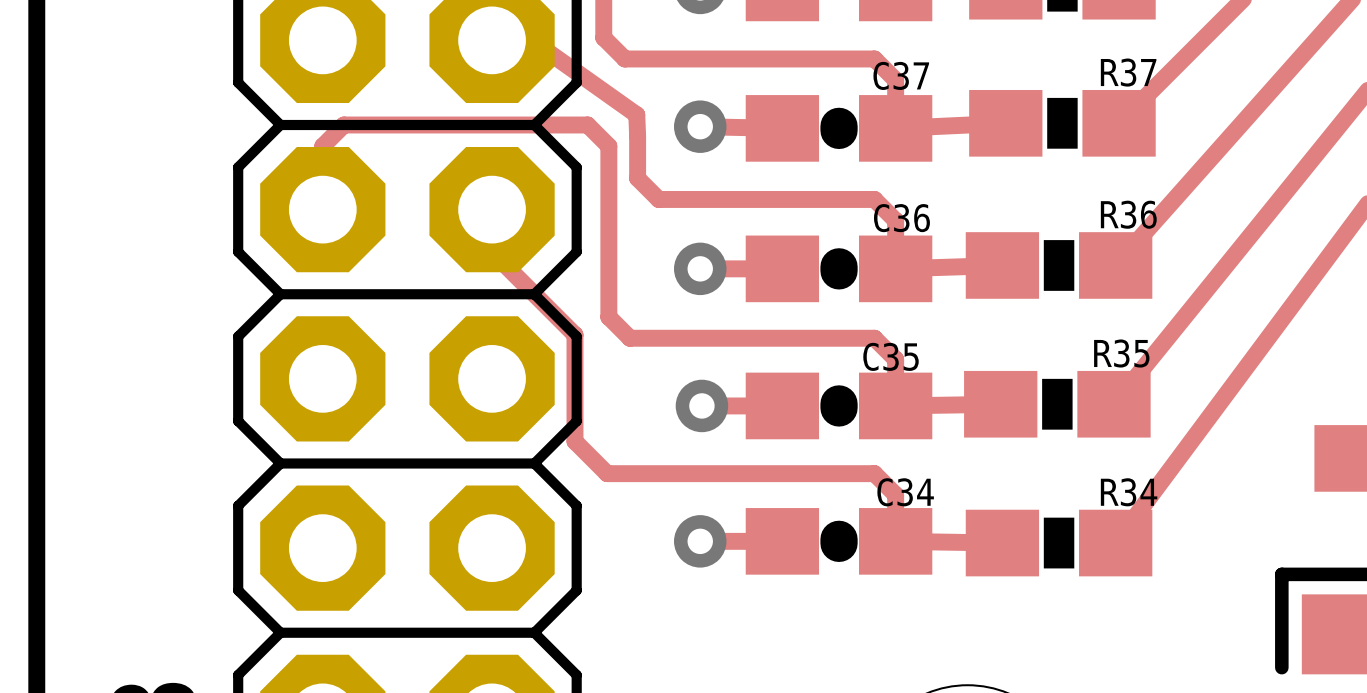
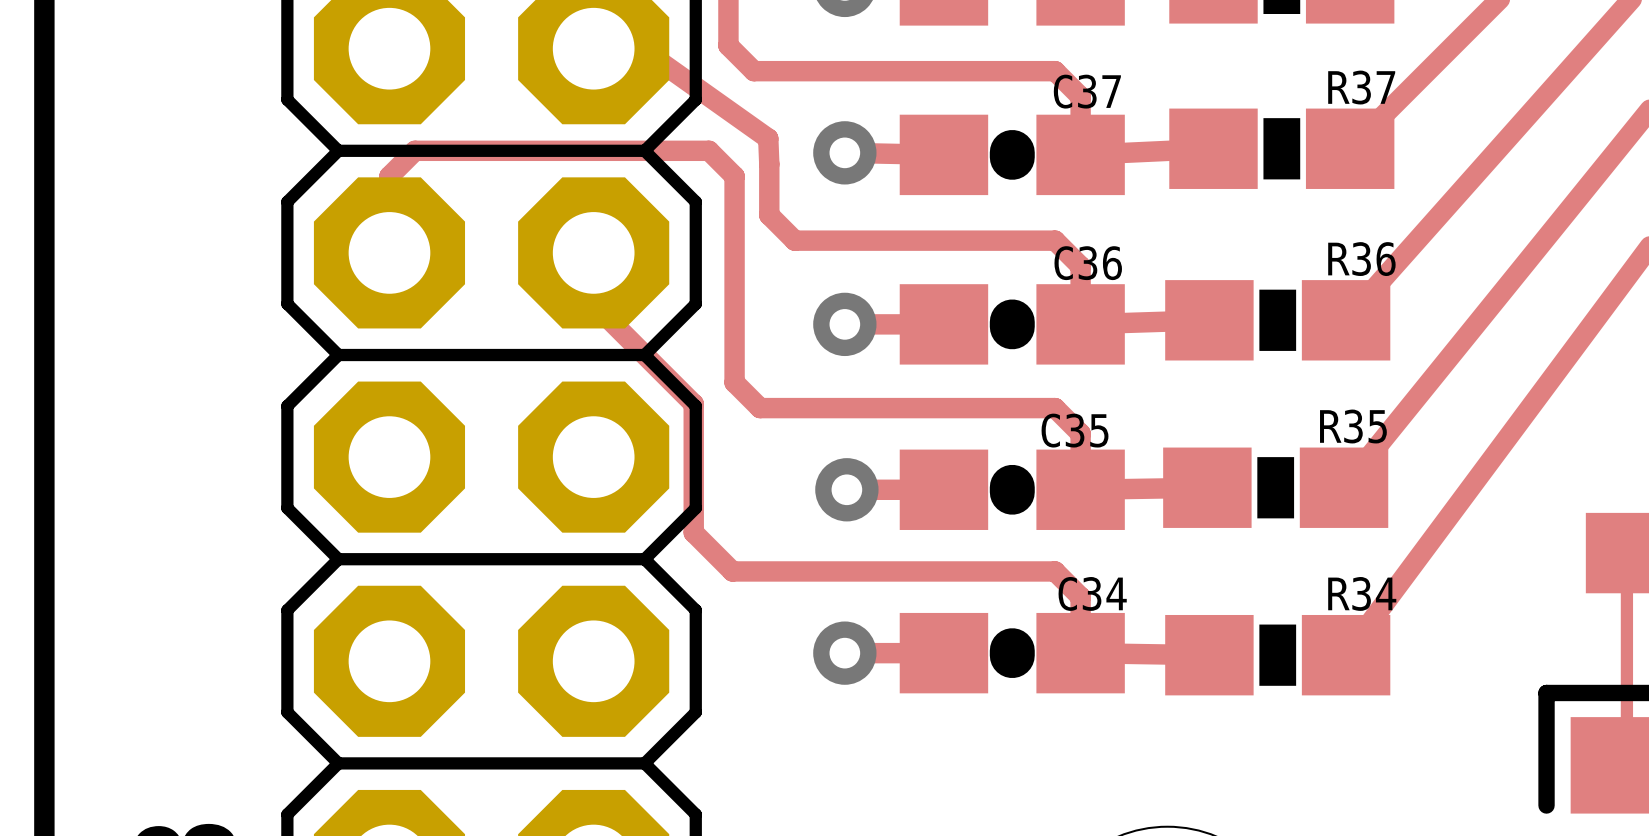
top track: none -> (1630, 553) (1626, 557) (1626, 765)

